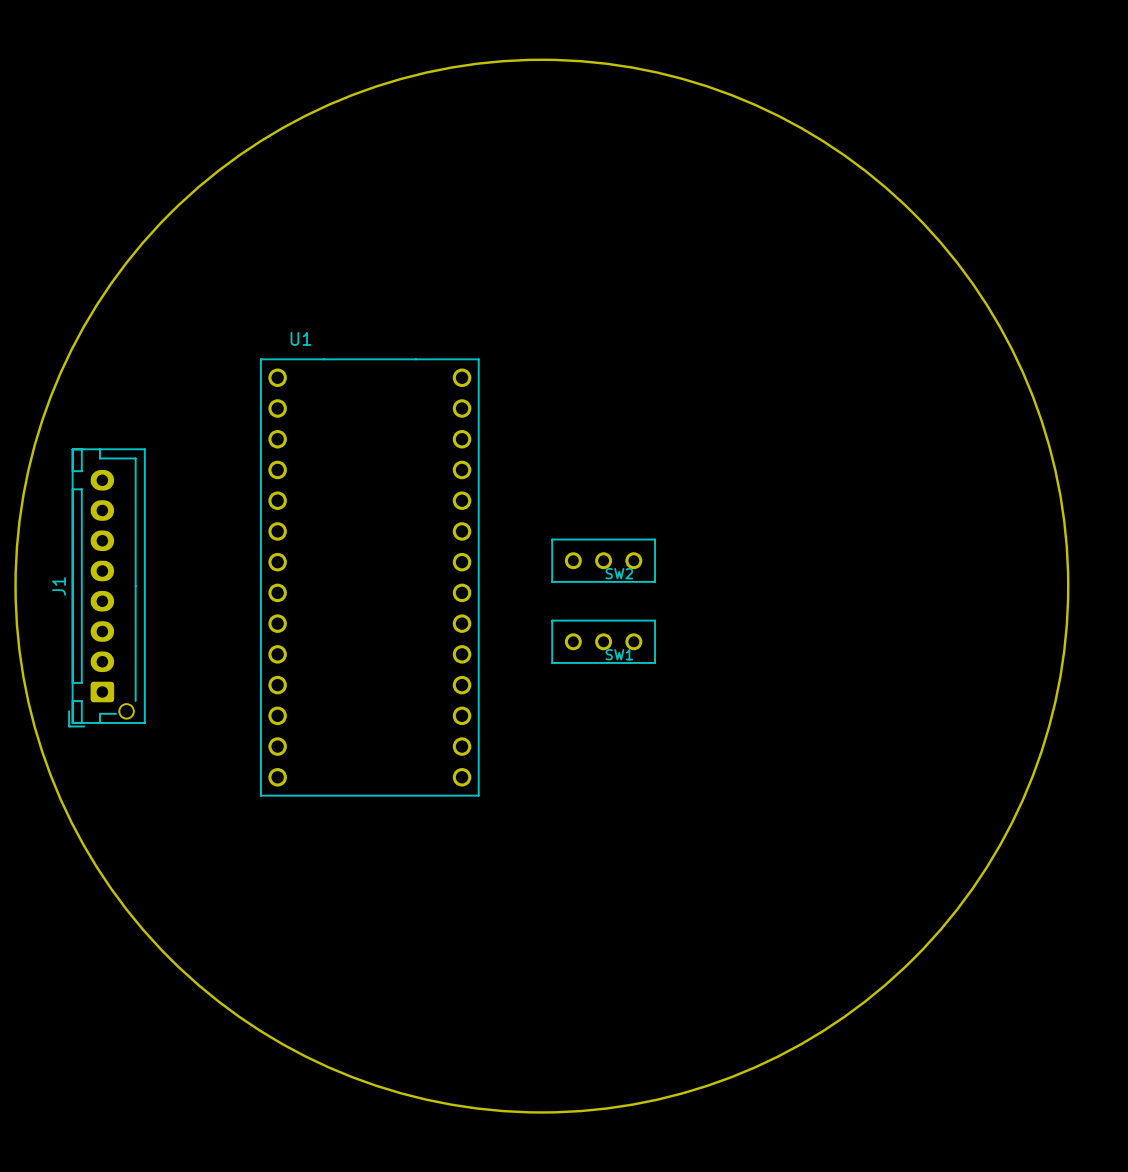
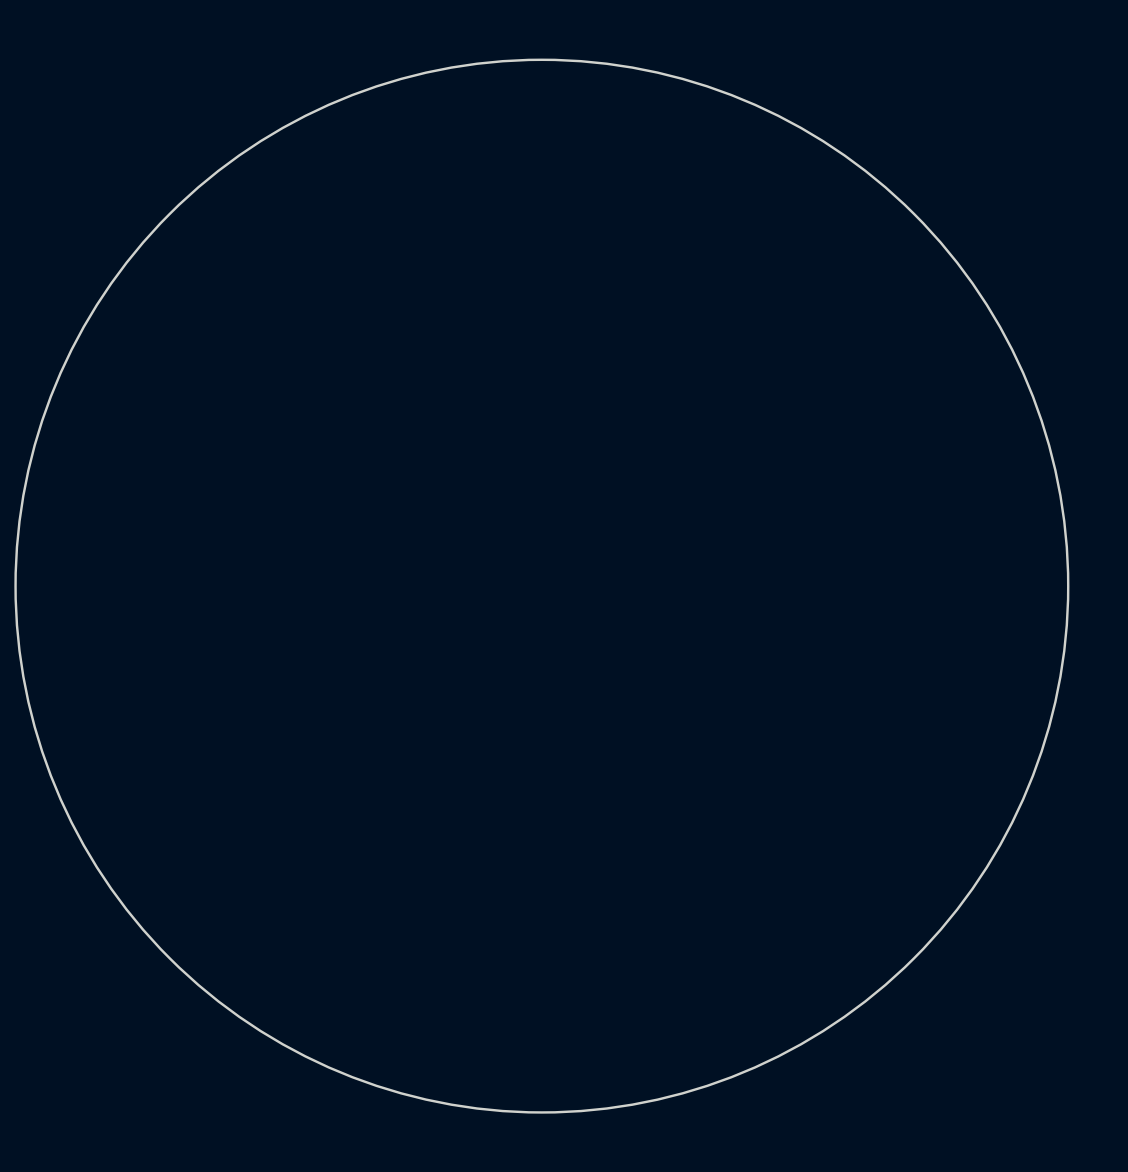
SW2: (603, 560) -> none
U1: (369, 577) -> none
J1: (106, 587) -> none
SW1: (603, 641) -> none

